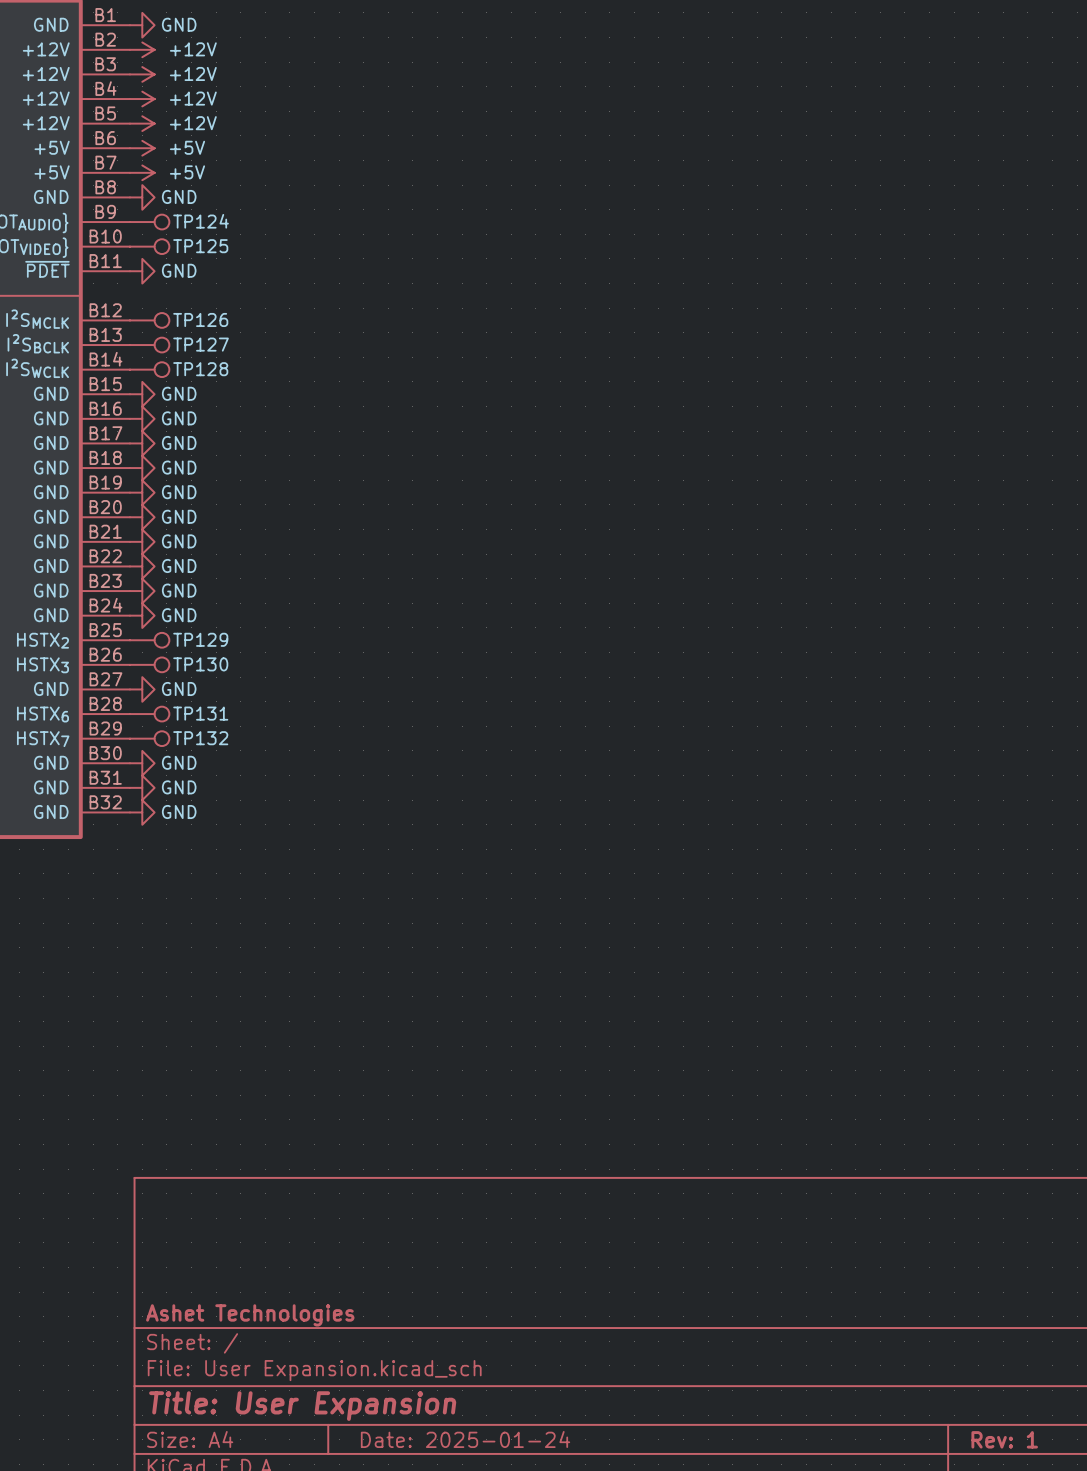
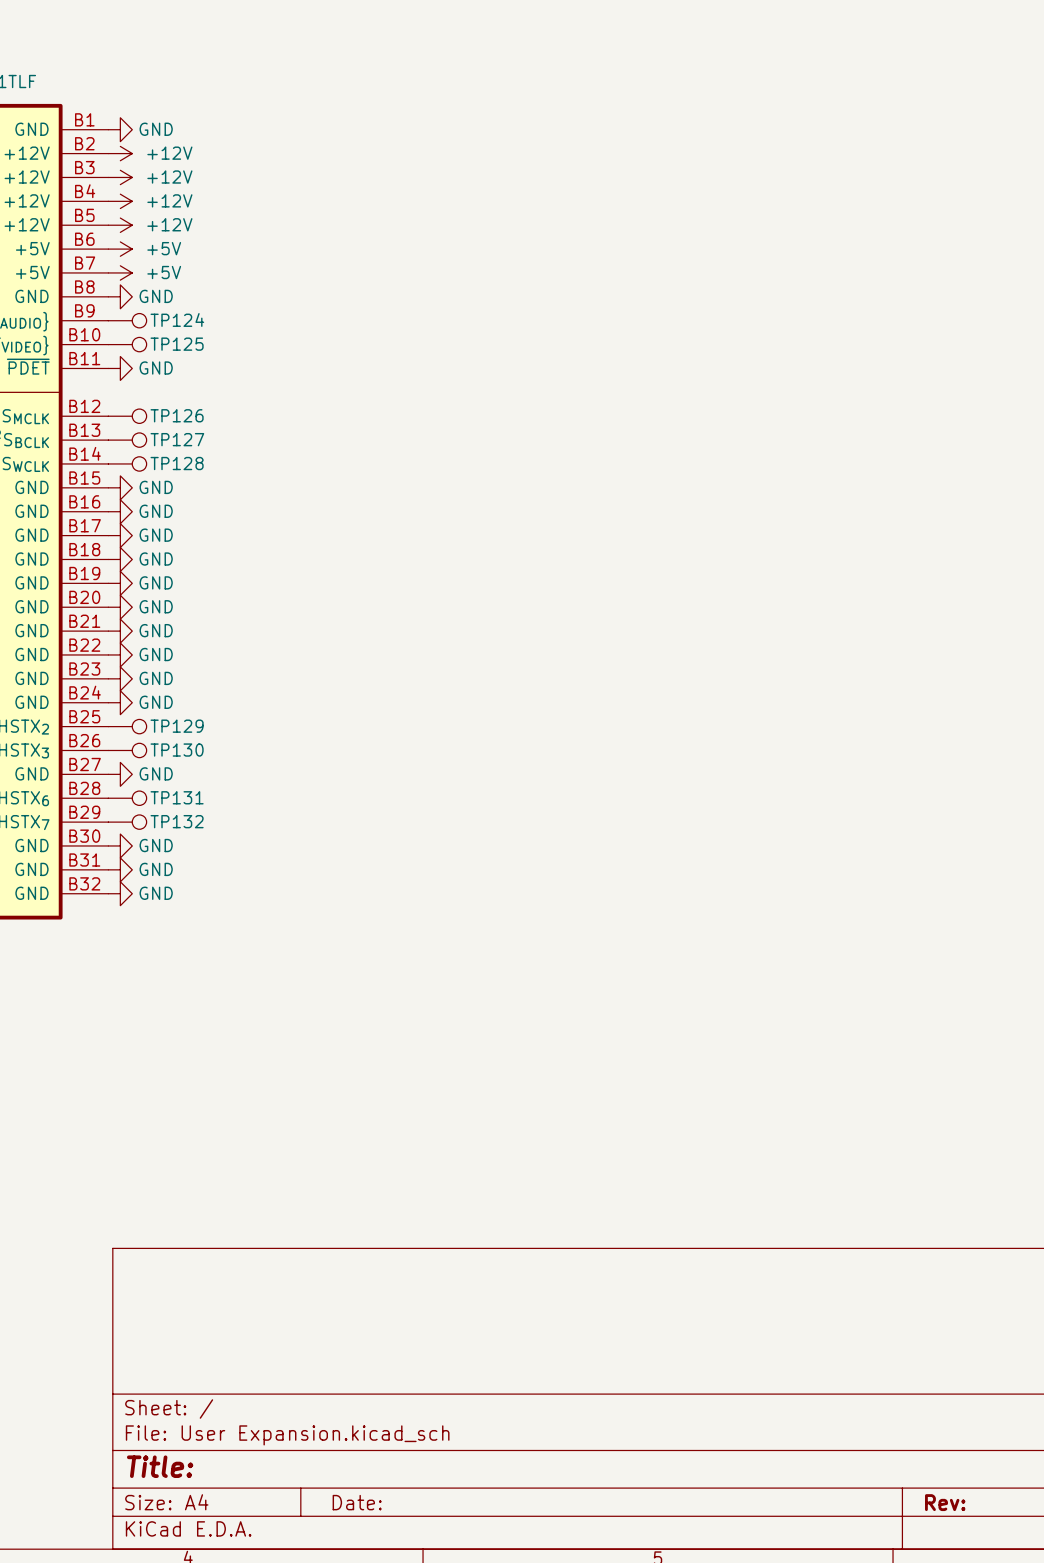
title block: Ashet Technologies (250, 1315) -> none
title block: Title: User Expansion (302, 1406) -> Title: (160, 1466)
title block: Date: 2025-01-24 (465, 1439) -> Date: (357, 1502)
title block: Rev: 1 (1004, 1439) -> Rev: (945, 1502)

